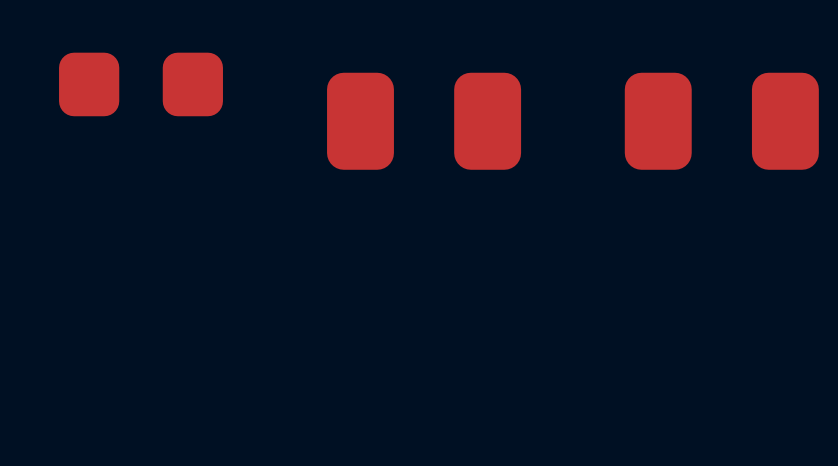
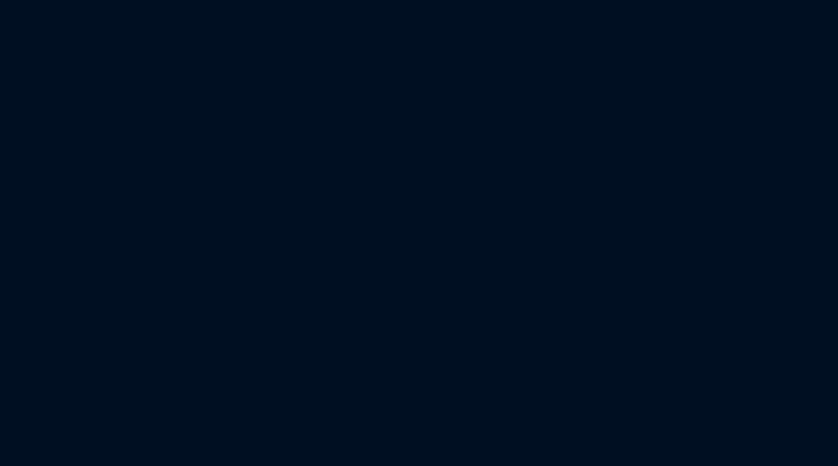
part: (141, 84) -> none
part: (424, 121) -> none
part: (721, 121) -> none

